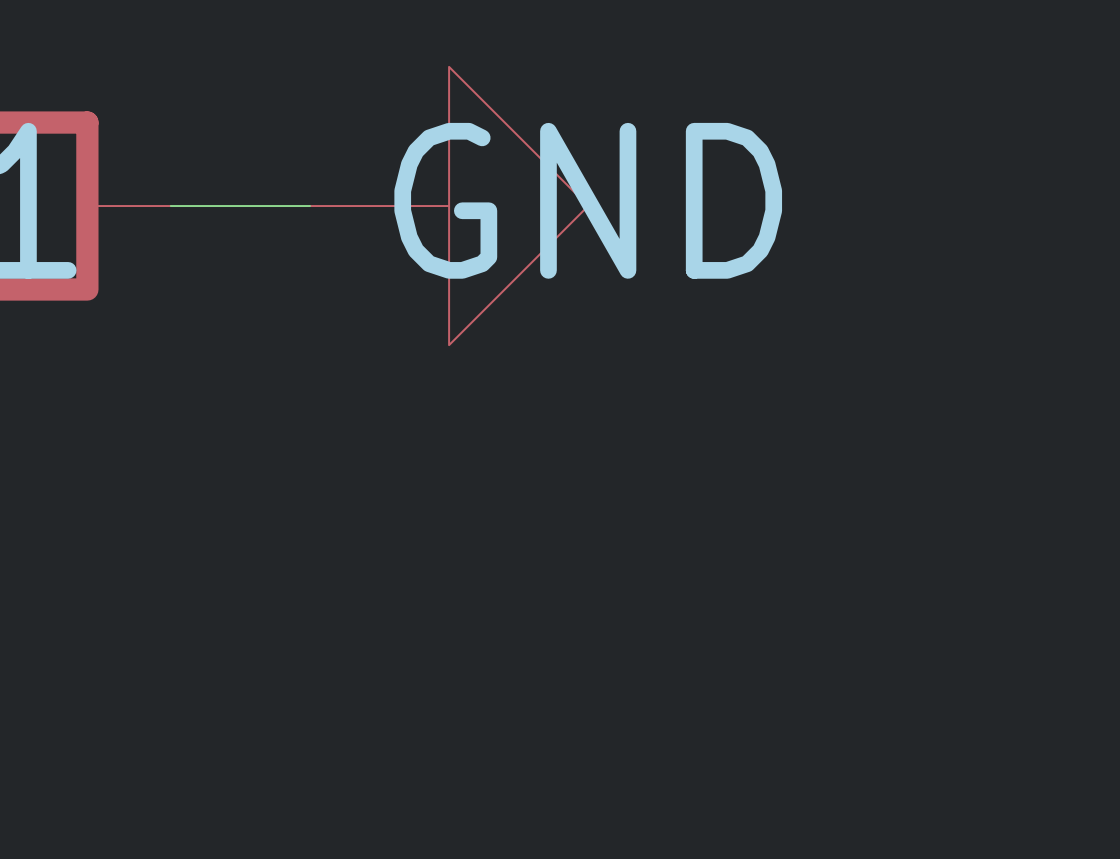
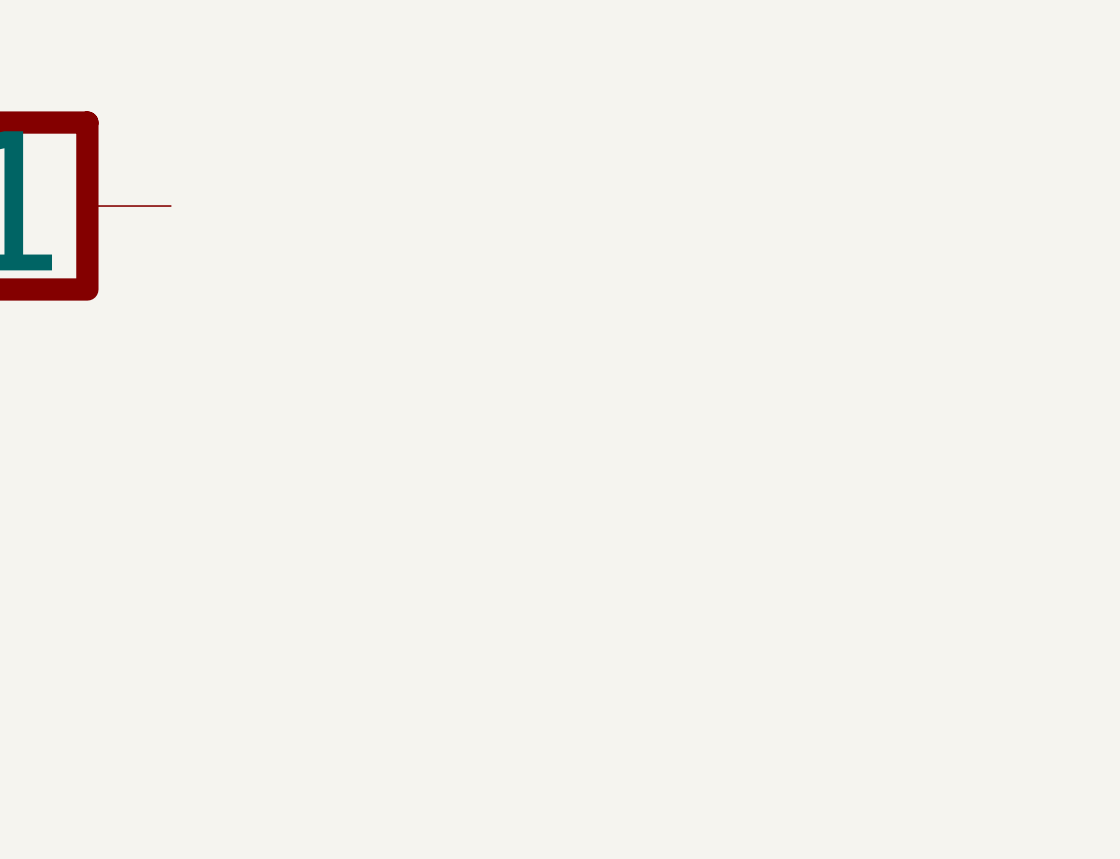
wire: (170, 206) (309, 206) -> none
power symbol: GND (449, 206) -> none

